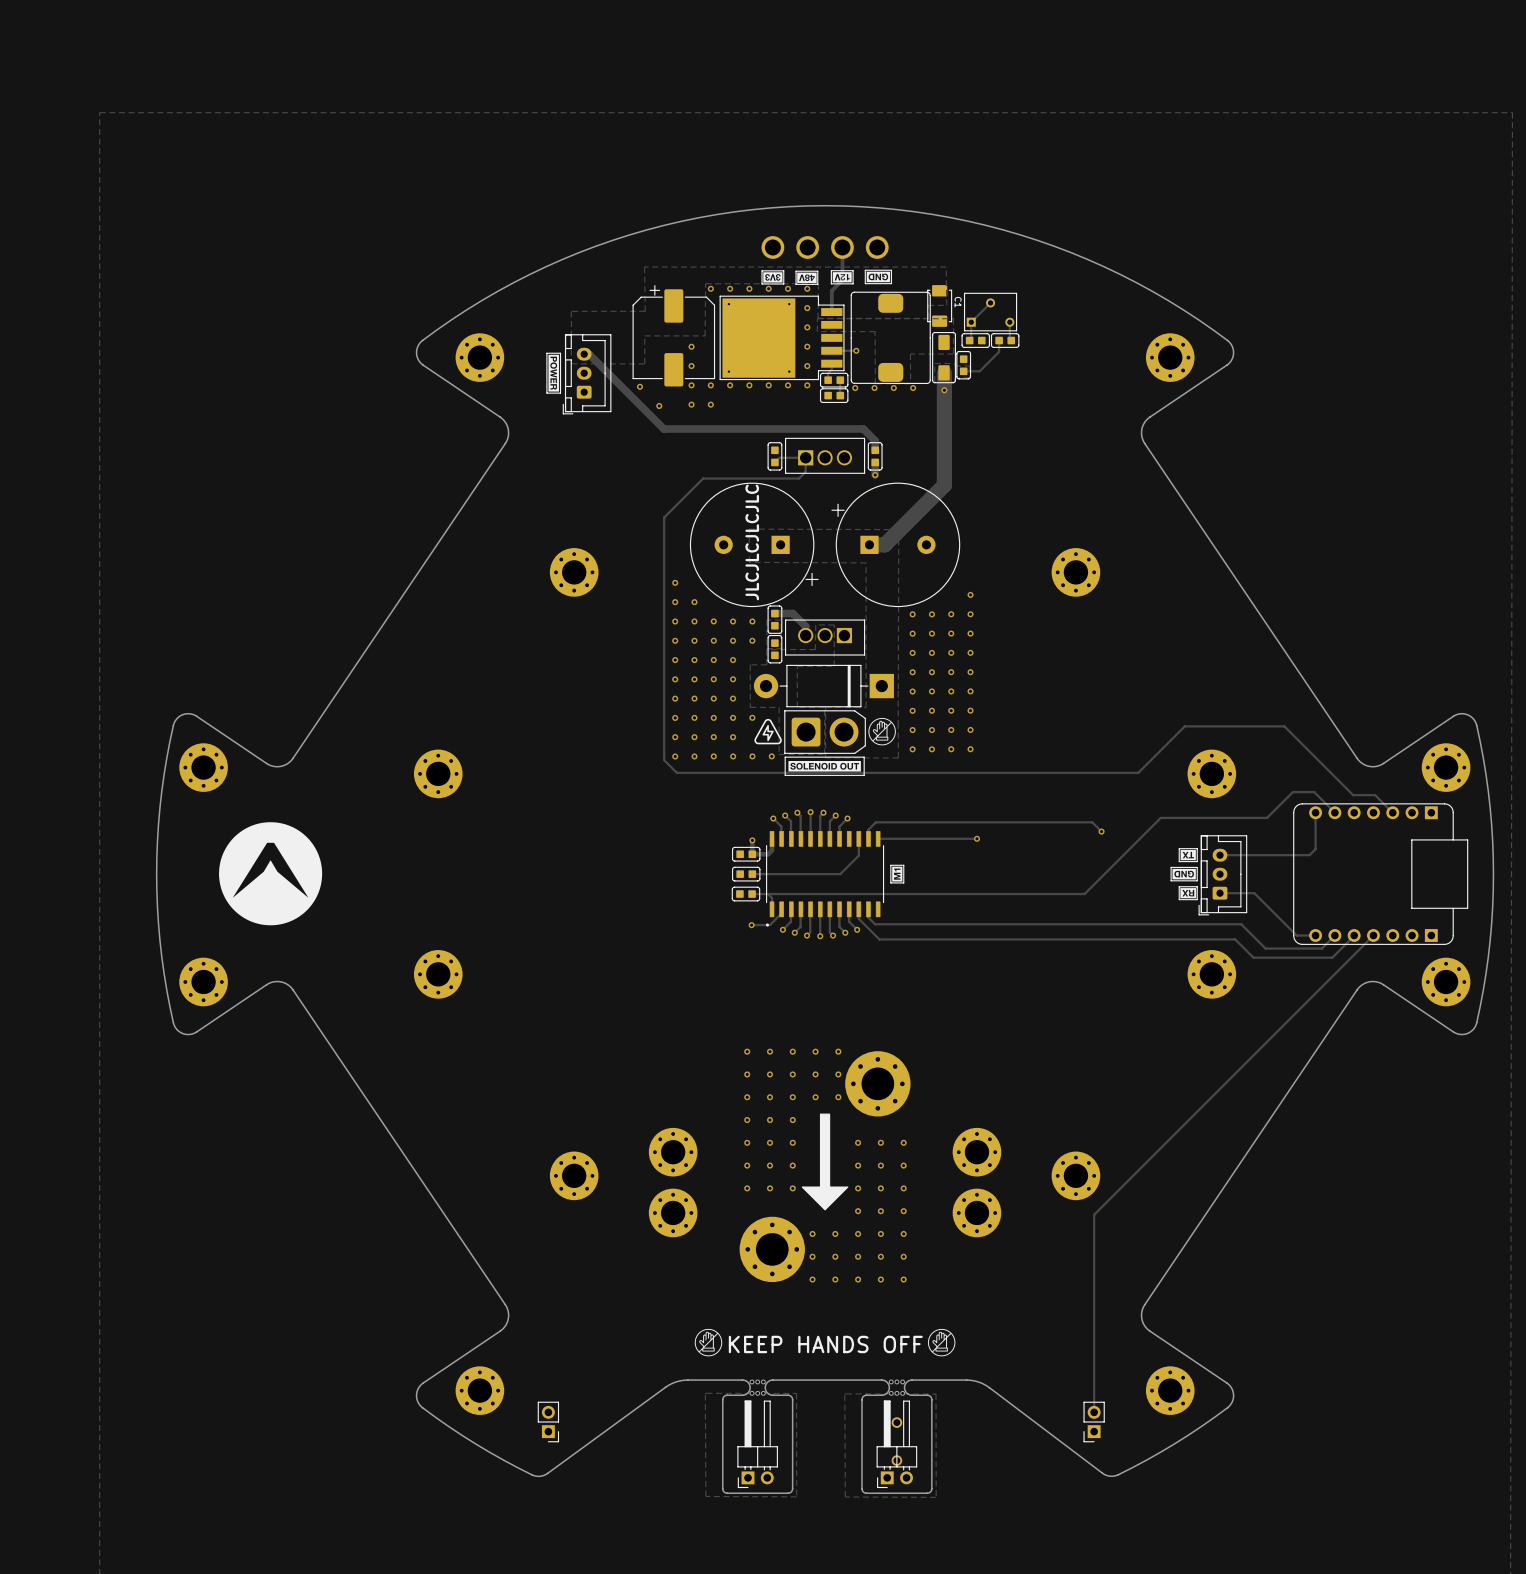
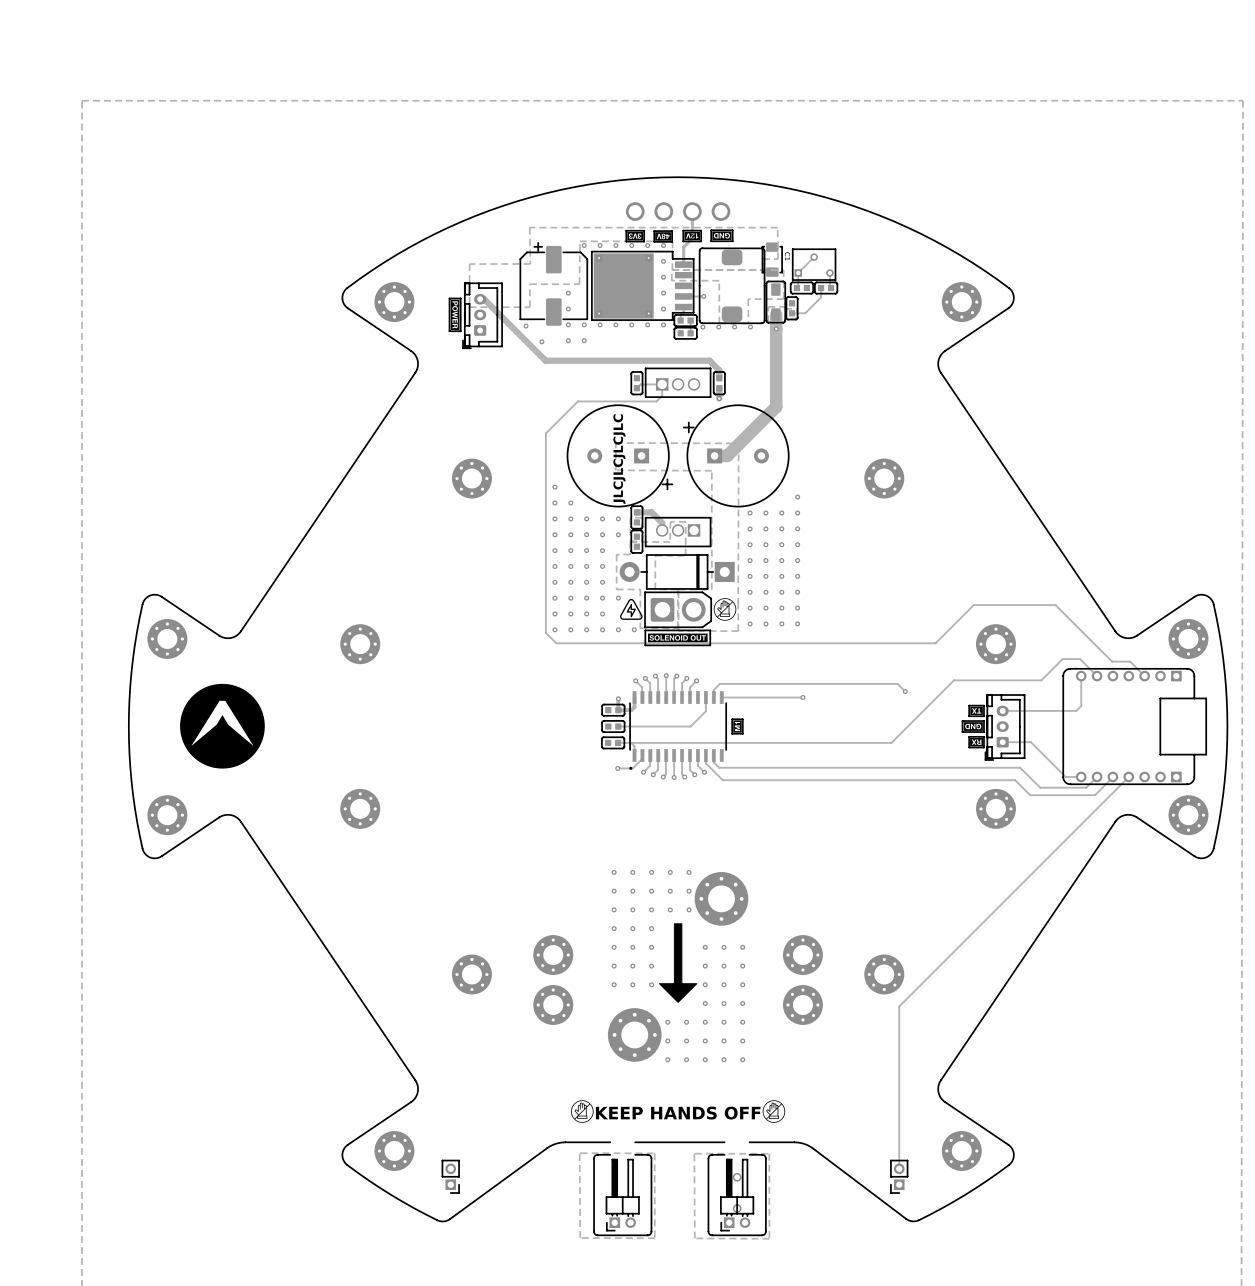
part: (757, 1387) -> none
part: (896, 1387) -> none

